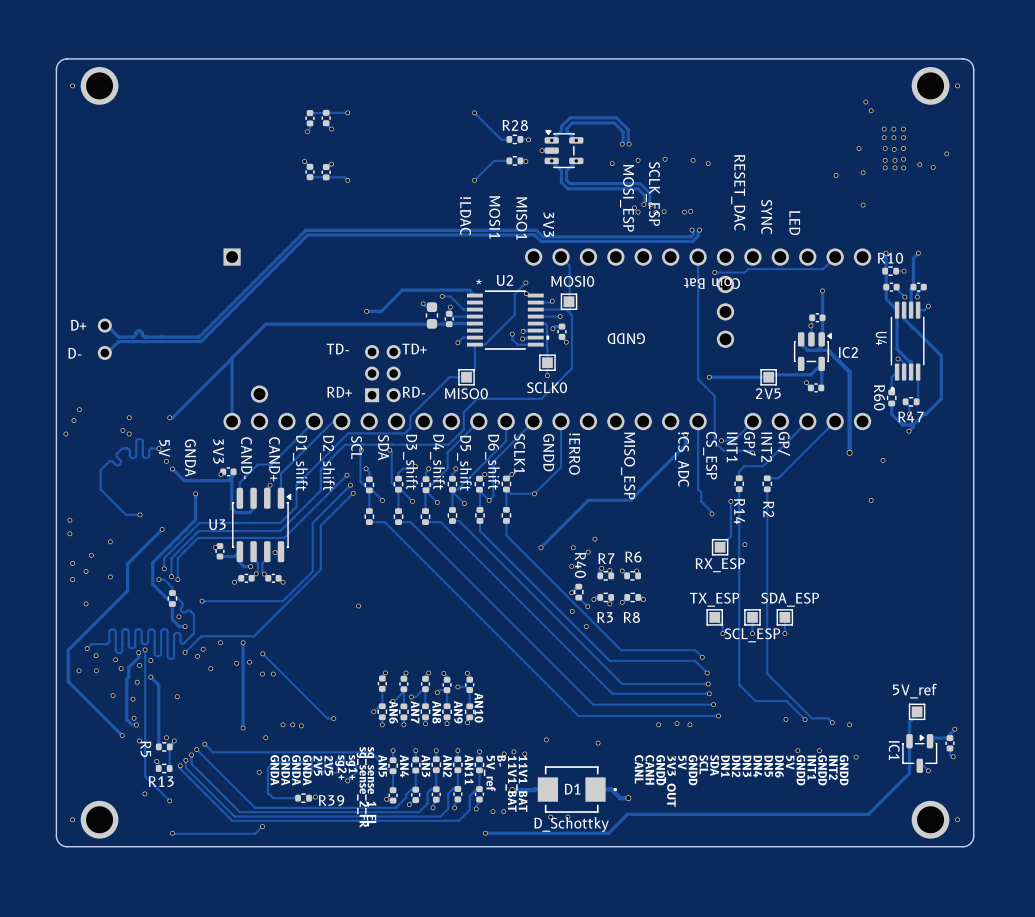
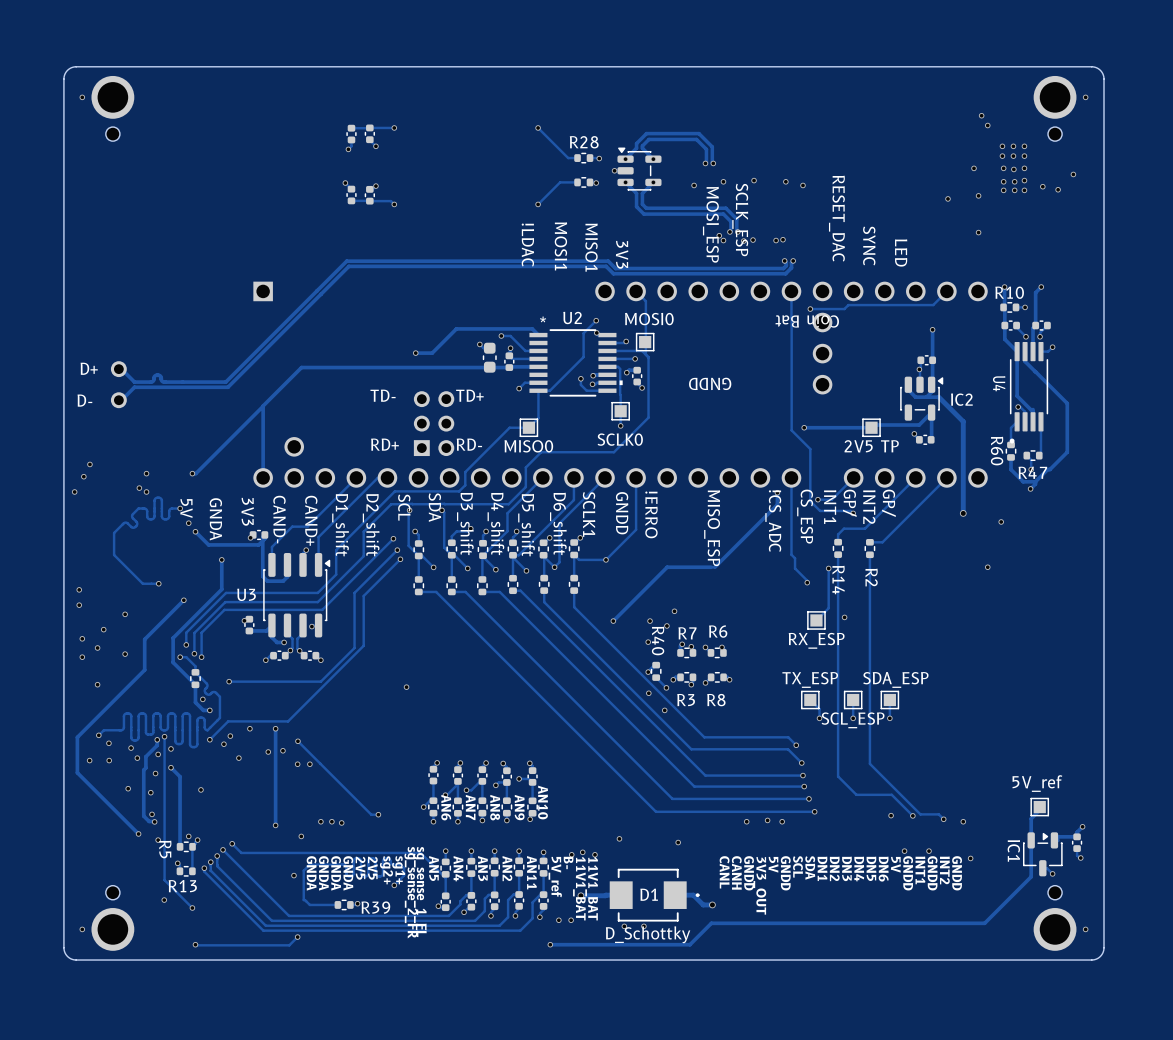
part: none -> (112, 134)
part: none -> (1055, 134)
part value: 2V5 (768, 393) -> 2V5 TP (871, 446)
part: none -> (112, 892)
part: none -> (1055, 892)

